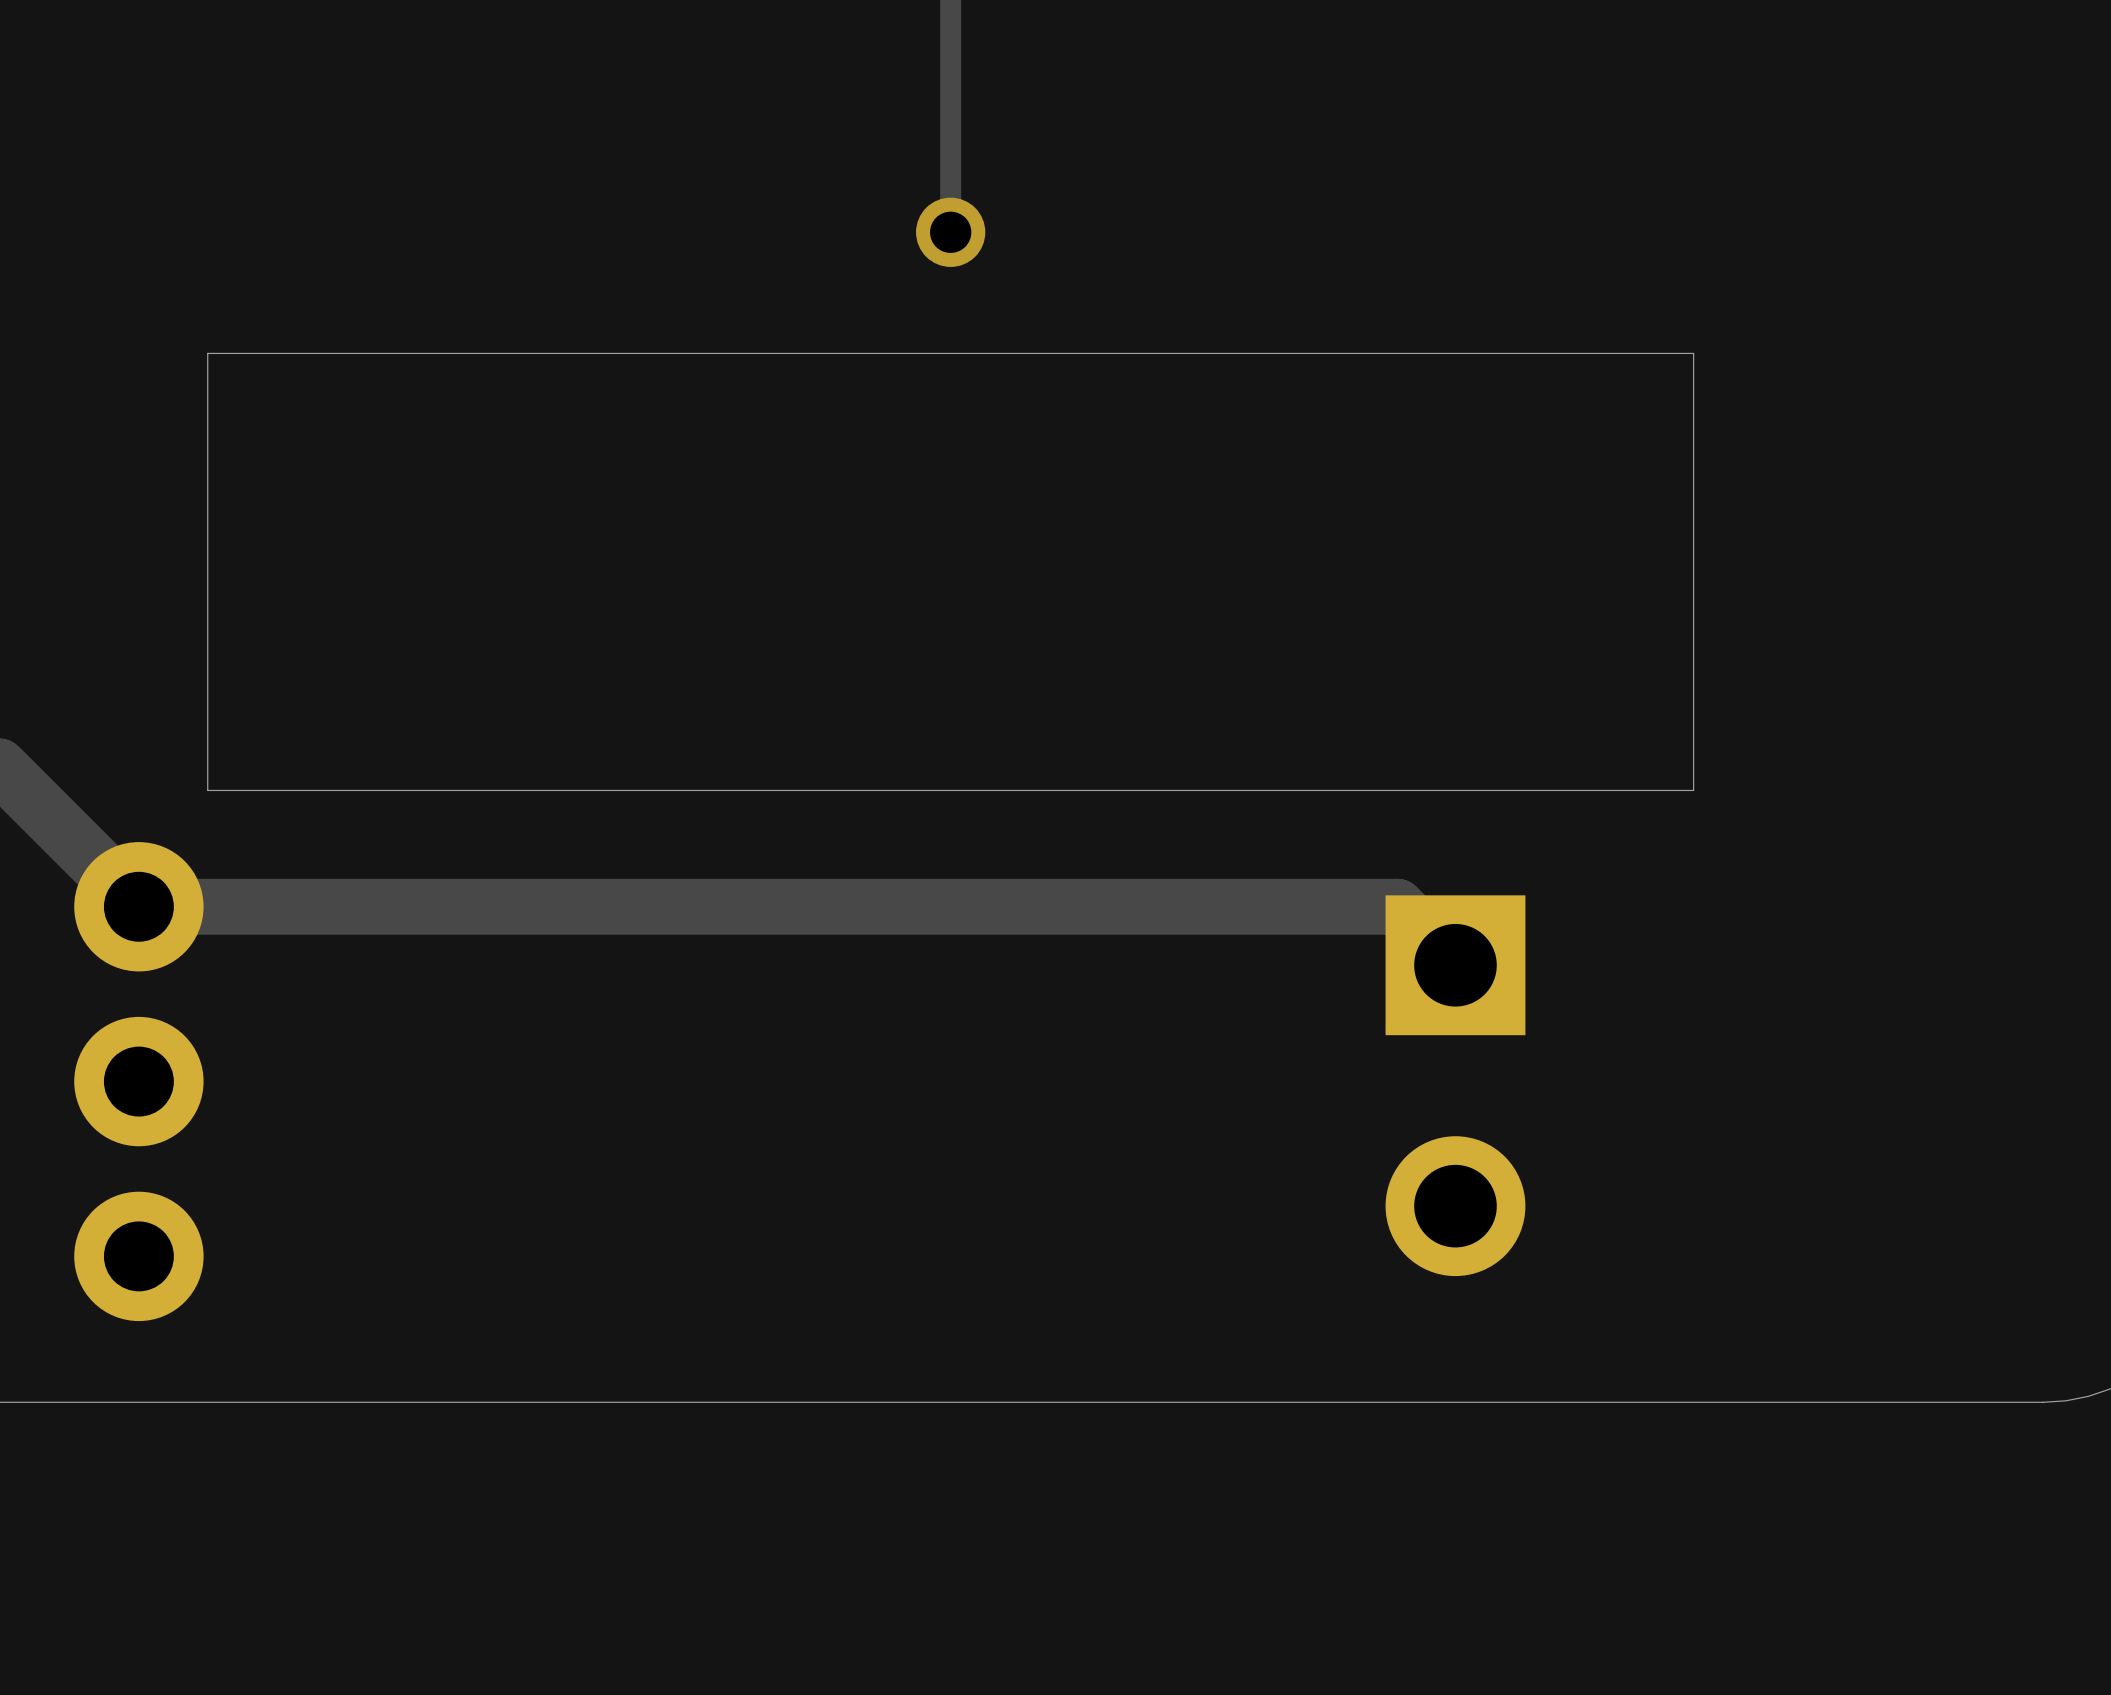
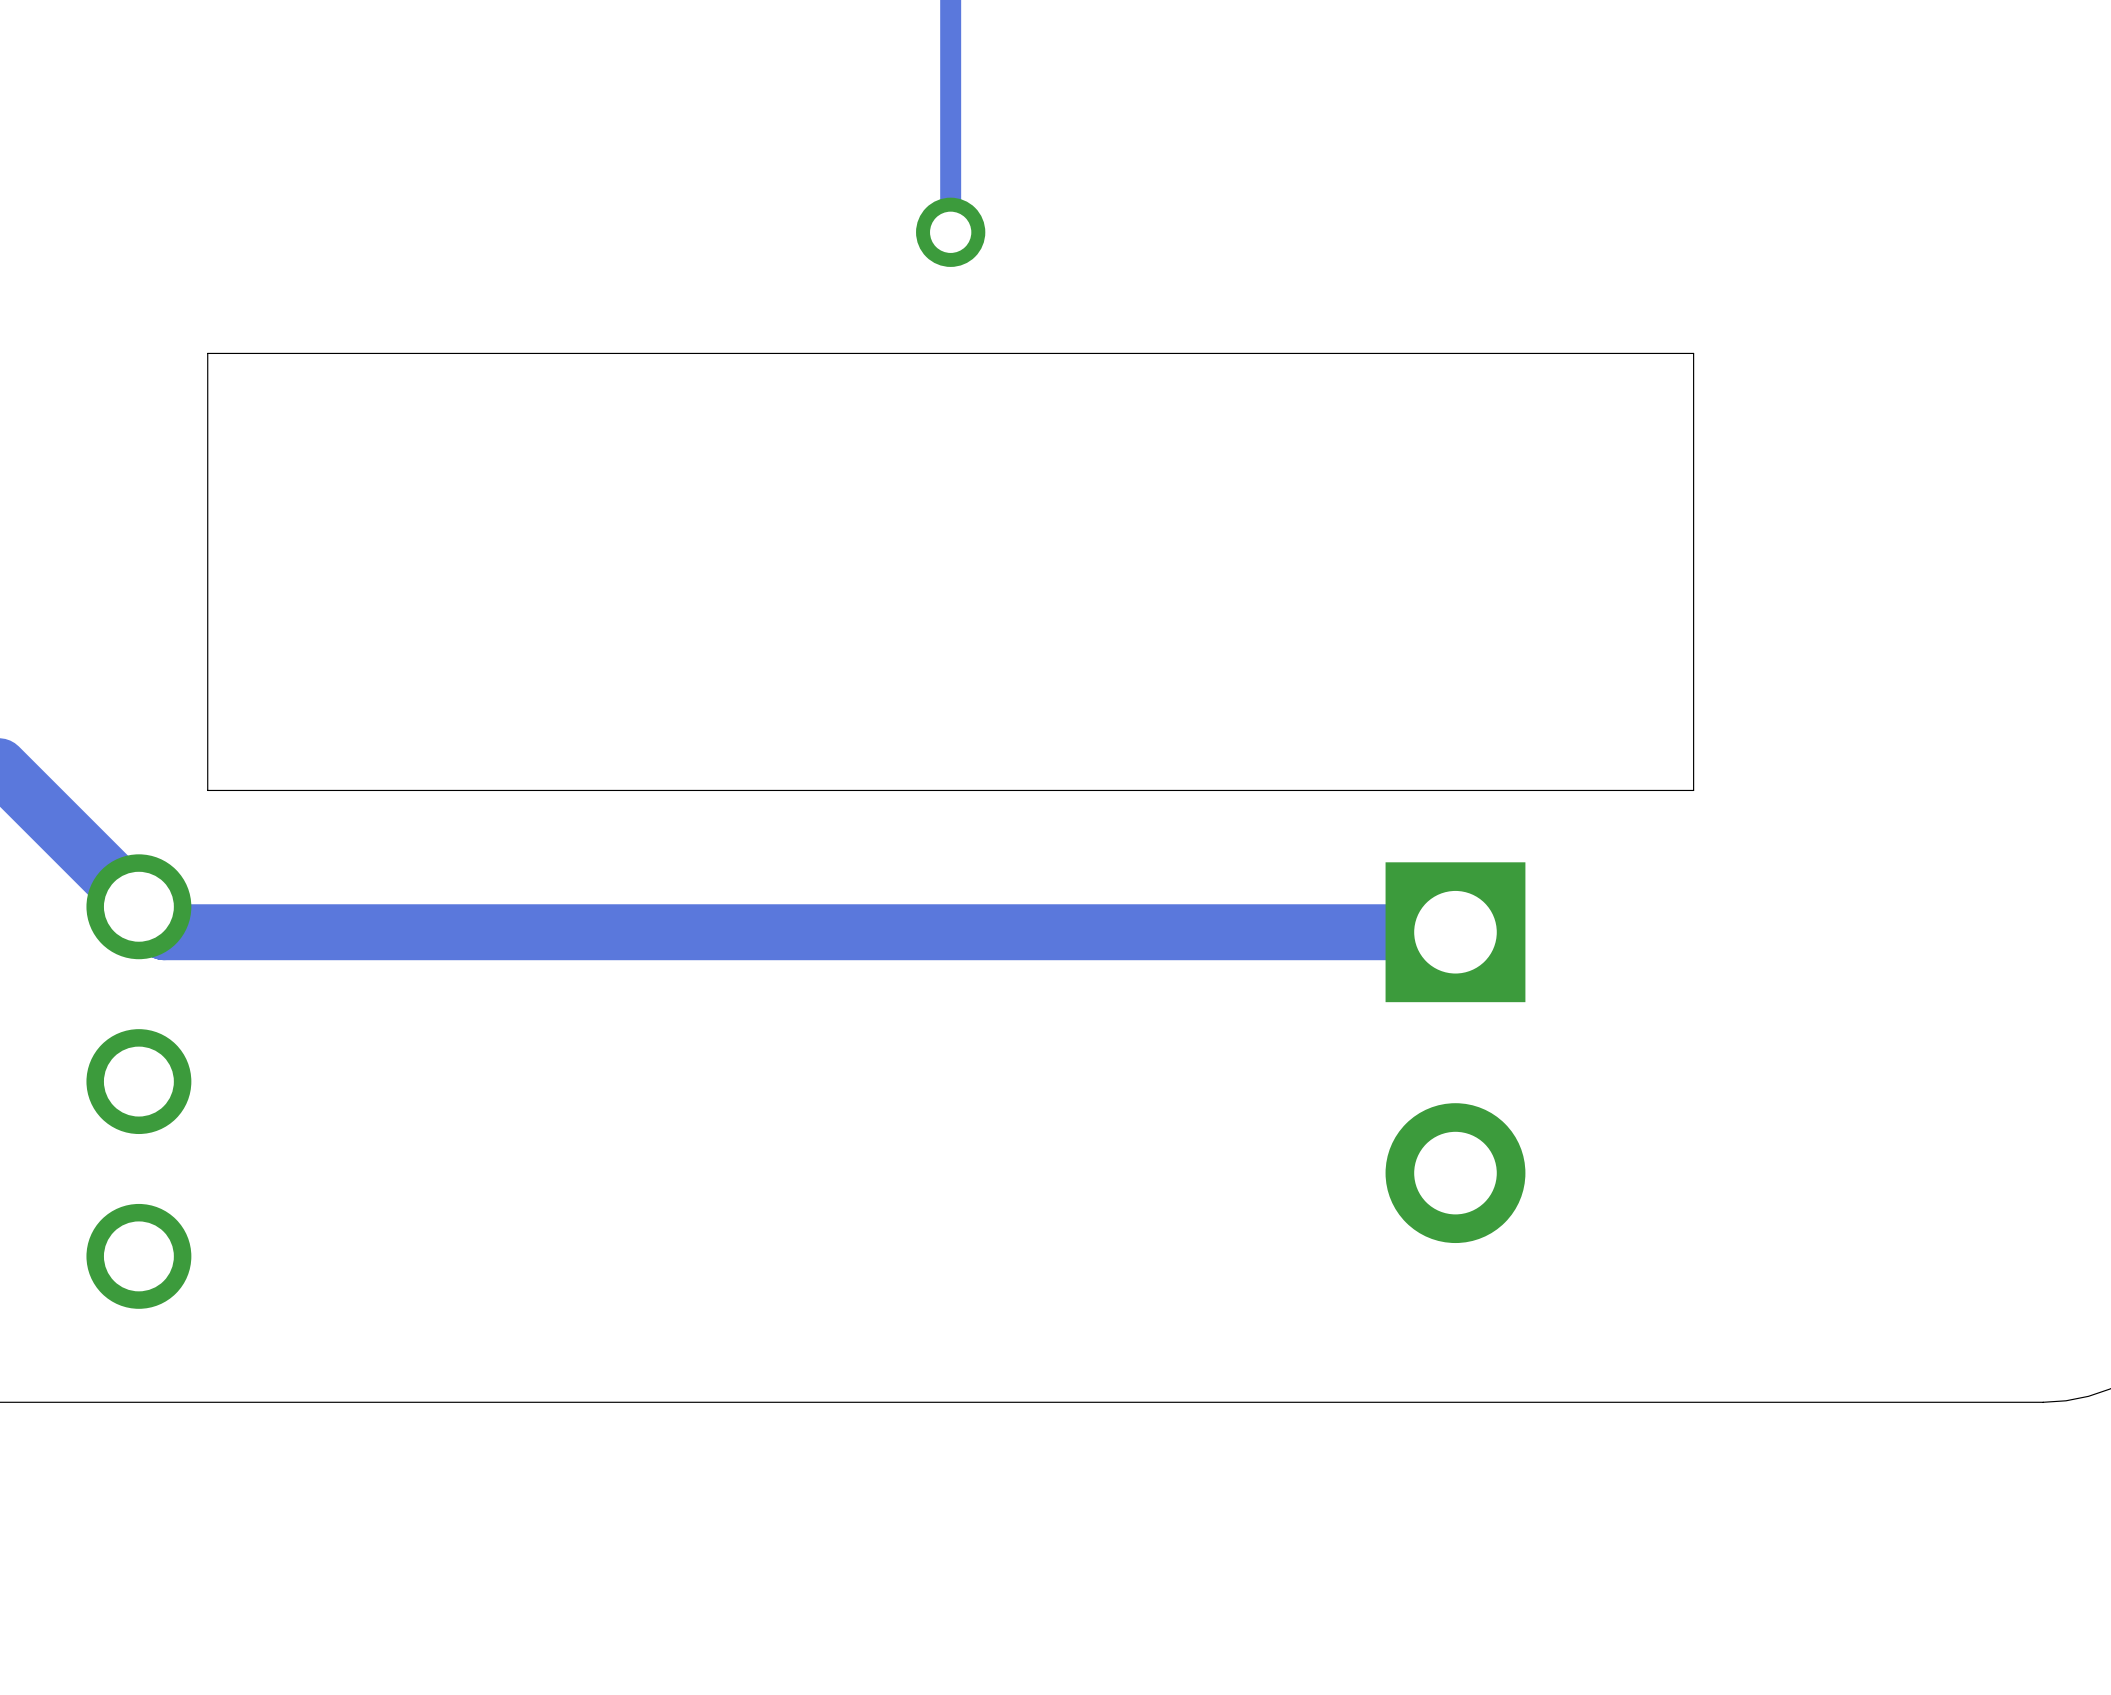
part footprint: [74, 842, 204, 1322] -> [86, 854, 192, 1309]
track: (138, 906) (1396, 906) (1455, 965) -> (138, 906) (164, 932) (1455, 932)
part position: (1455, 1085) -> (1455, 1052)

